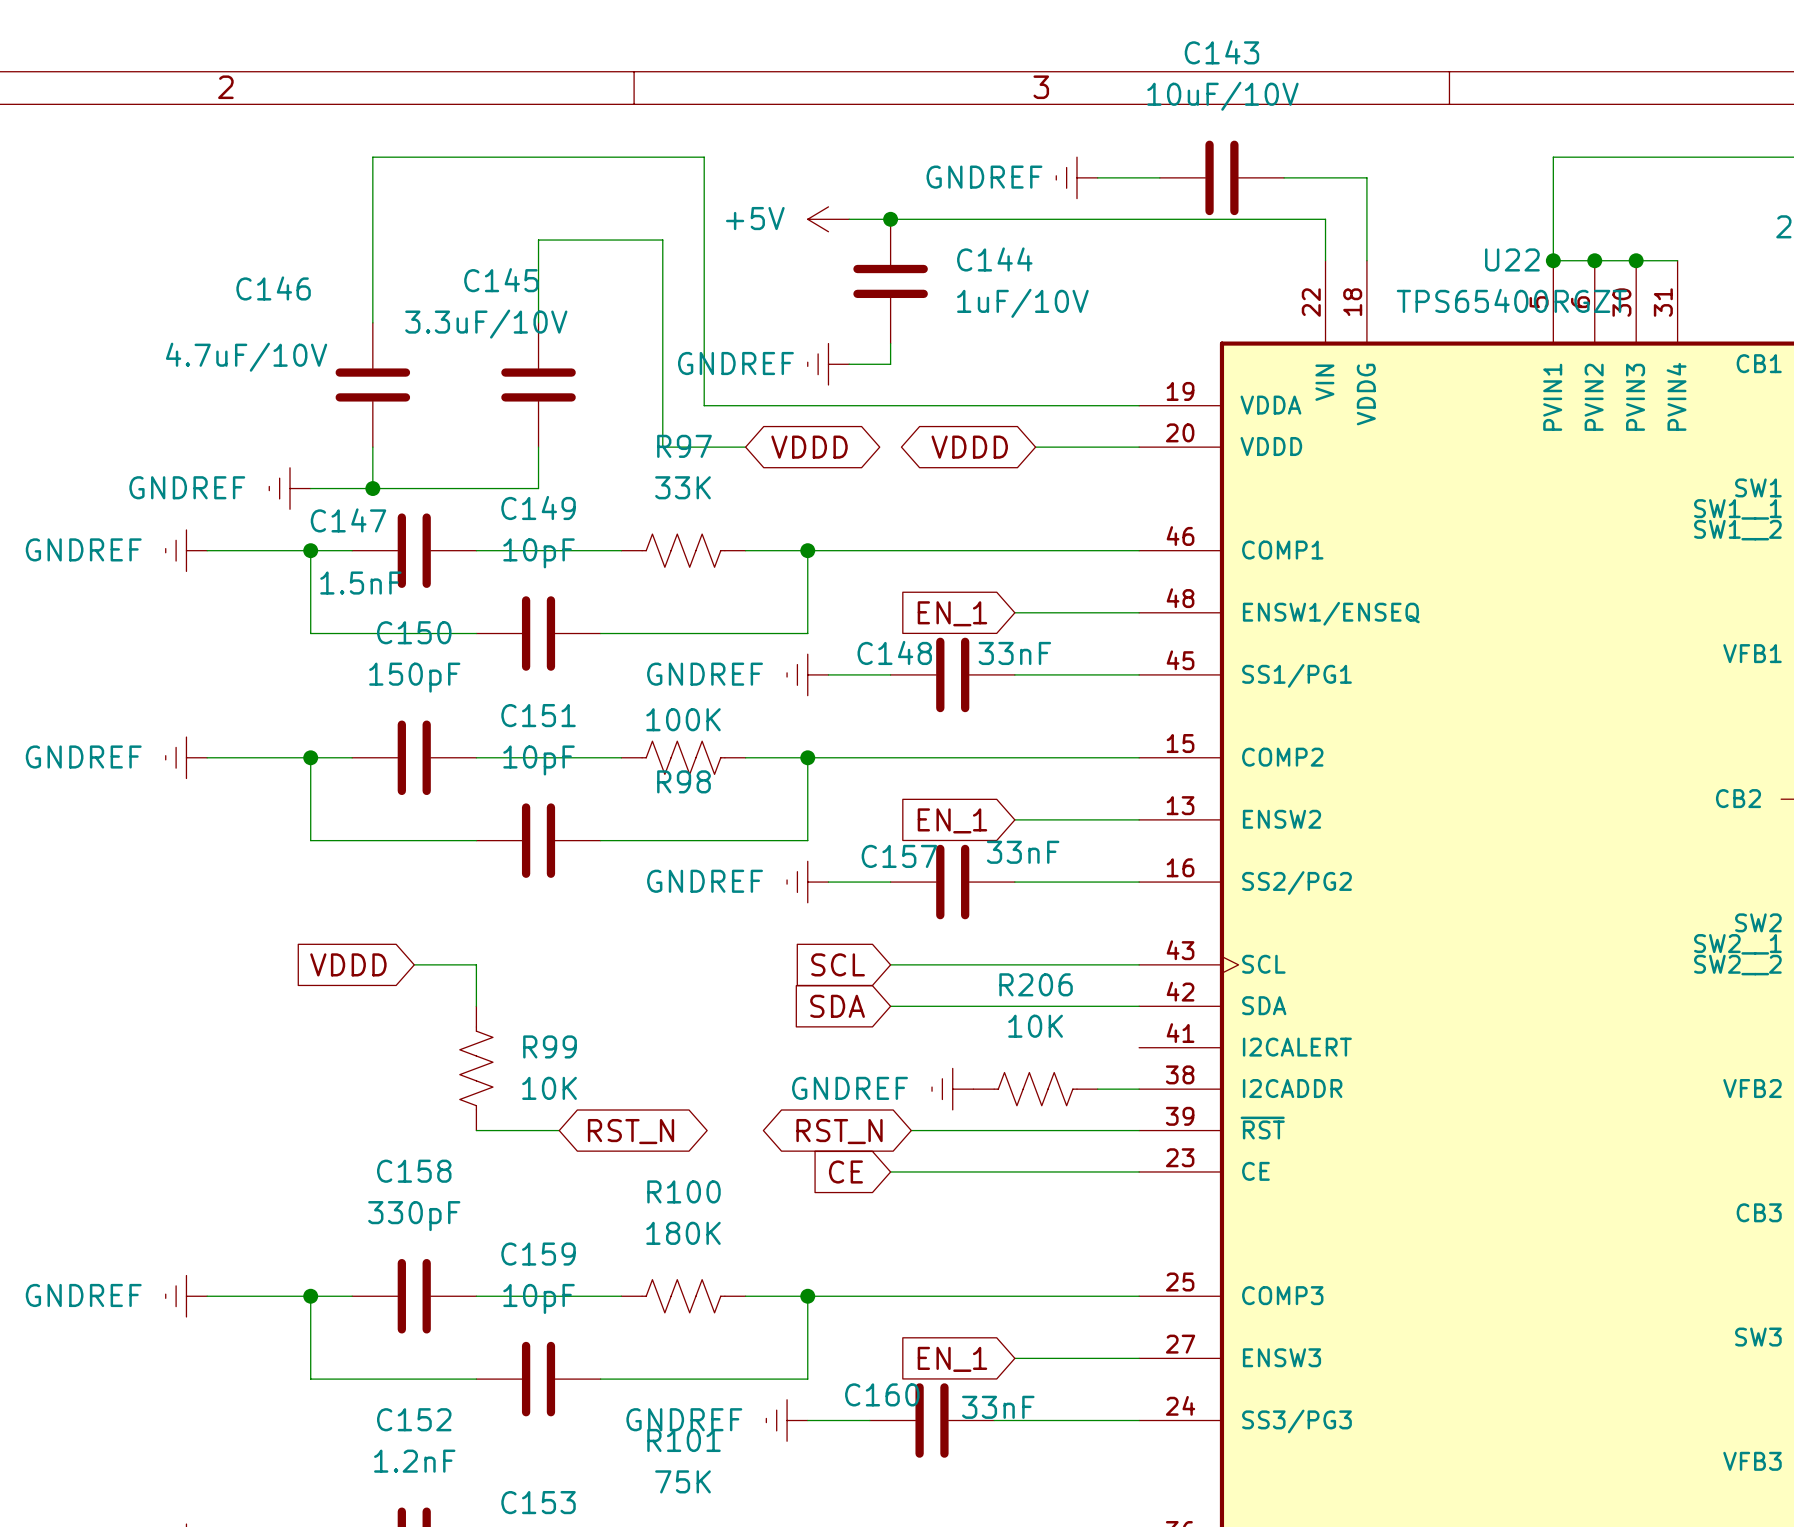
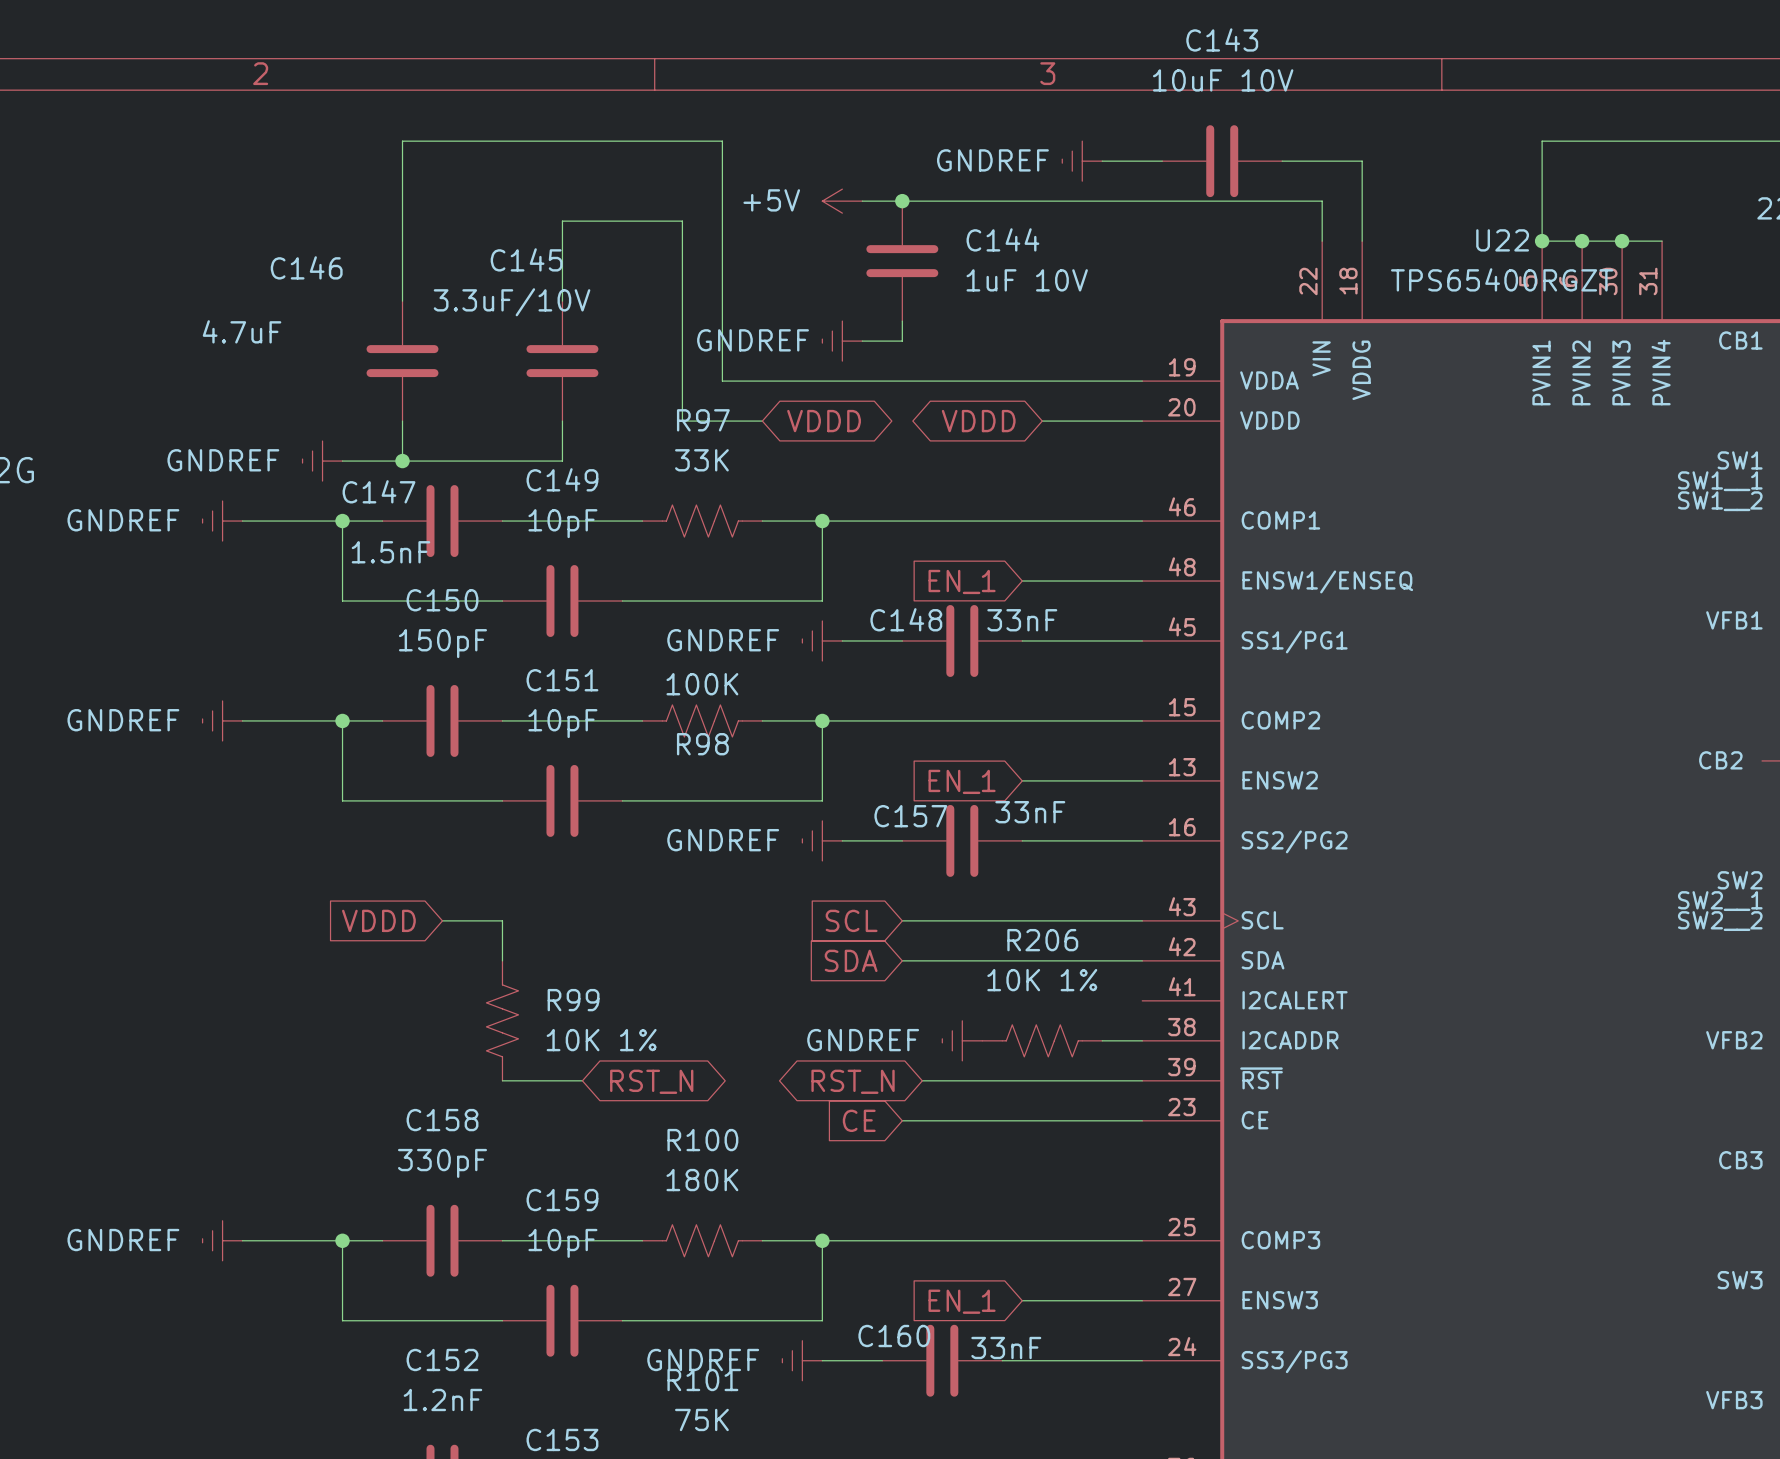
C143 value: 10uF/10V (1222, 96) -> 10uF 10V (1223, 80)
C144 value: 1uF/10V (1022, 303) -> 1uF 10V (1027, 280)
C146 value: 4.7uF/10V (246, 357) -> 4.7uF (242, 331)
R206 value: 10K (1035, 1026) -> 10K 1% (1042, 980)
R99 value: 10K (549, 1088) -> 10K 1% (601, 1040)

